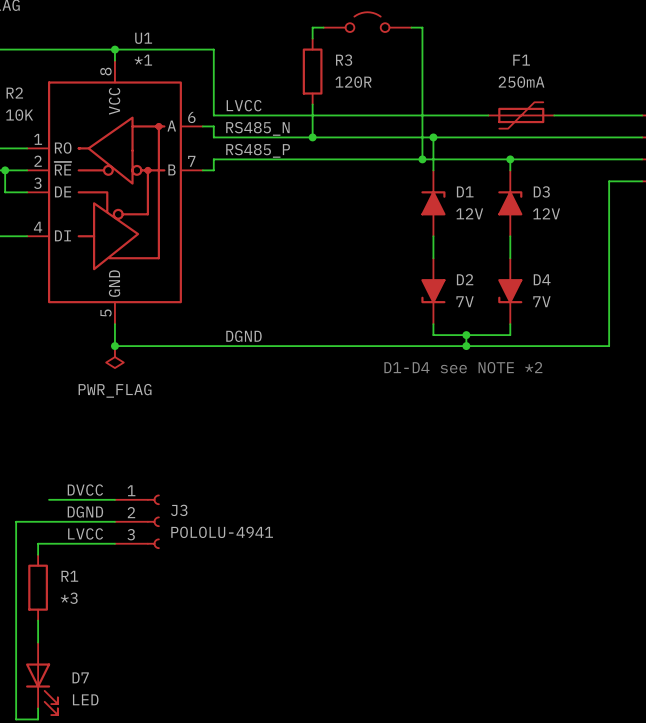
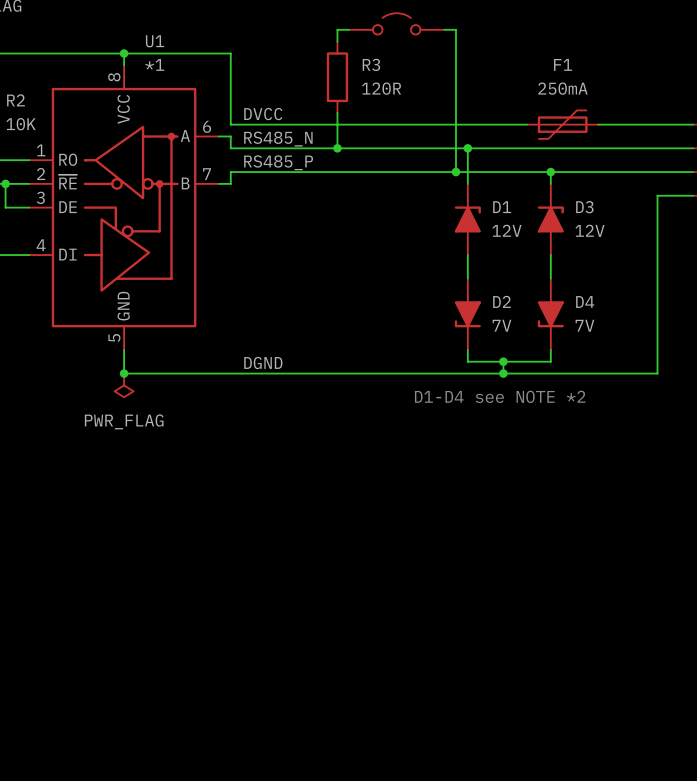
label: LVCC (244, 105) -> DVCC (263, 114)
label: DVCC (85, 490) -> none
wire: (49, 499) (114, 499) -> none
label: DGND (85, 511) -> none
wire: (114, 521) (16, 521) (16, 719) (38, 719) (38, 708) -> none
J3: POLOLU-4941 (137, 521) -> none
label: LVCC (85, 533) -> none
wire: (114, 543) (38, 543) (38, 554) -> none
R1: *3 (38, 587) -> none
wire: (38, 620) (38, 642) -> none
D7: LED (41, 678) -> none

